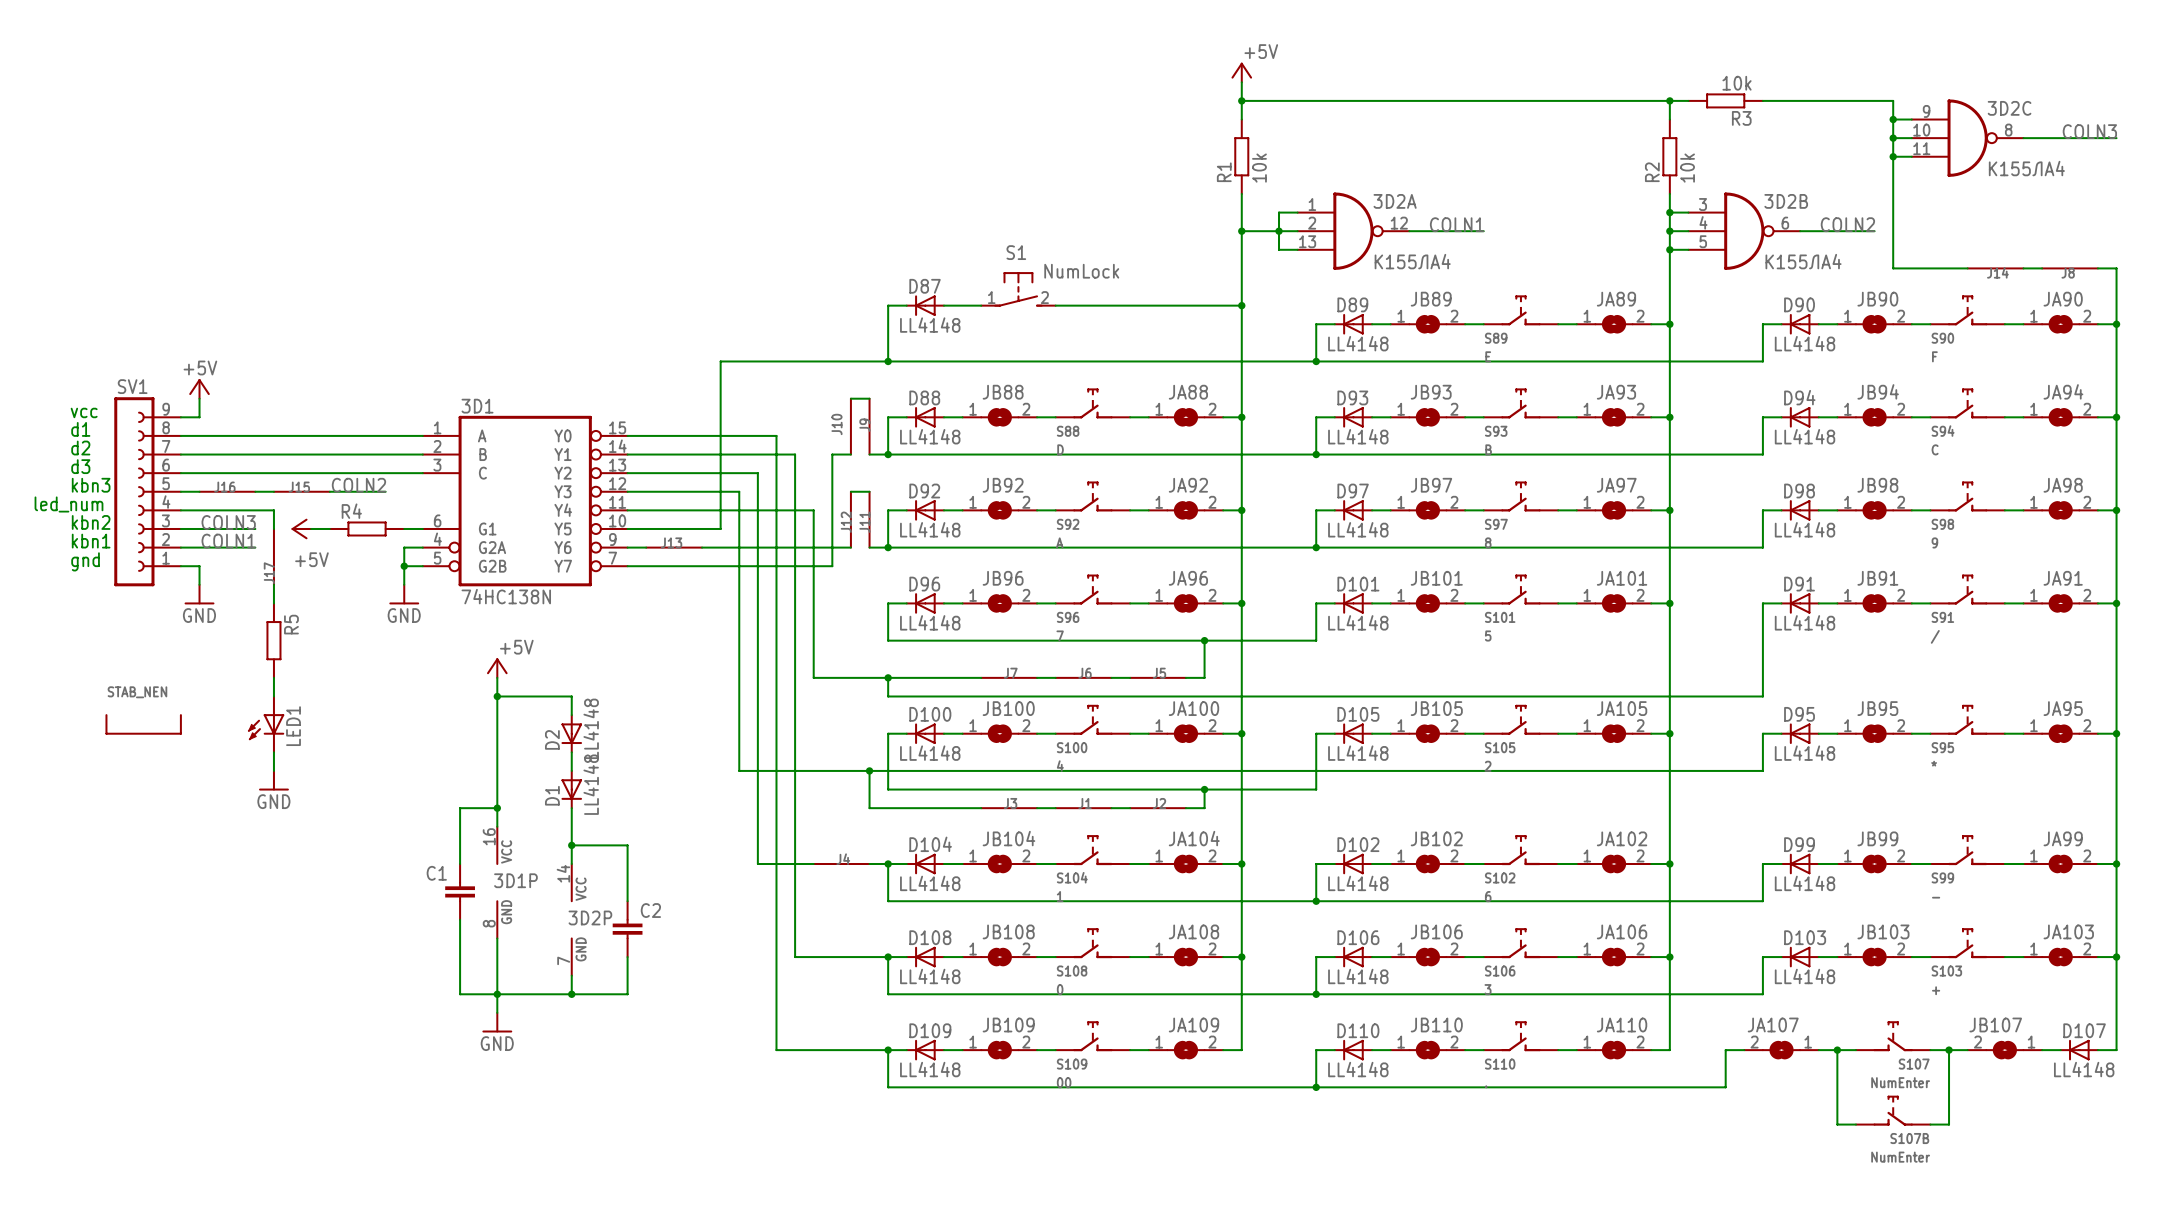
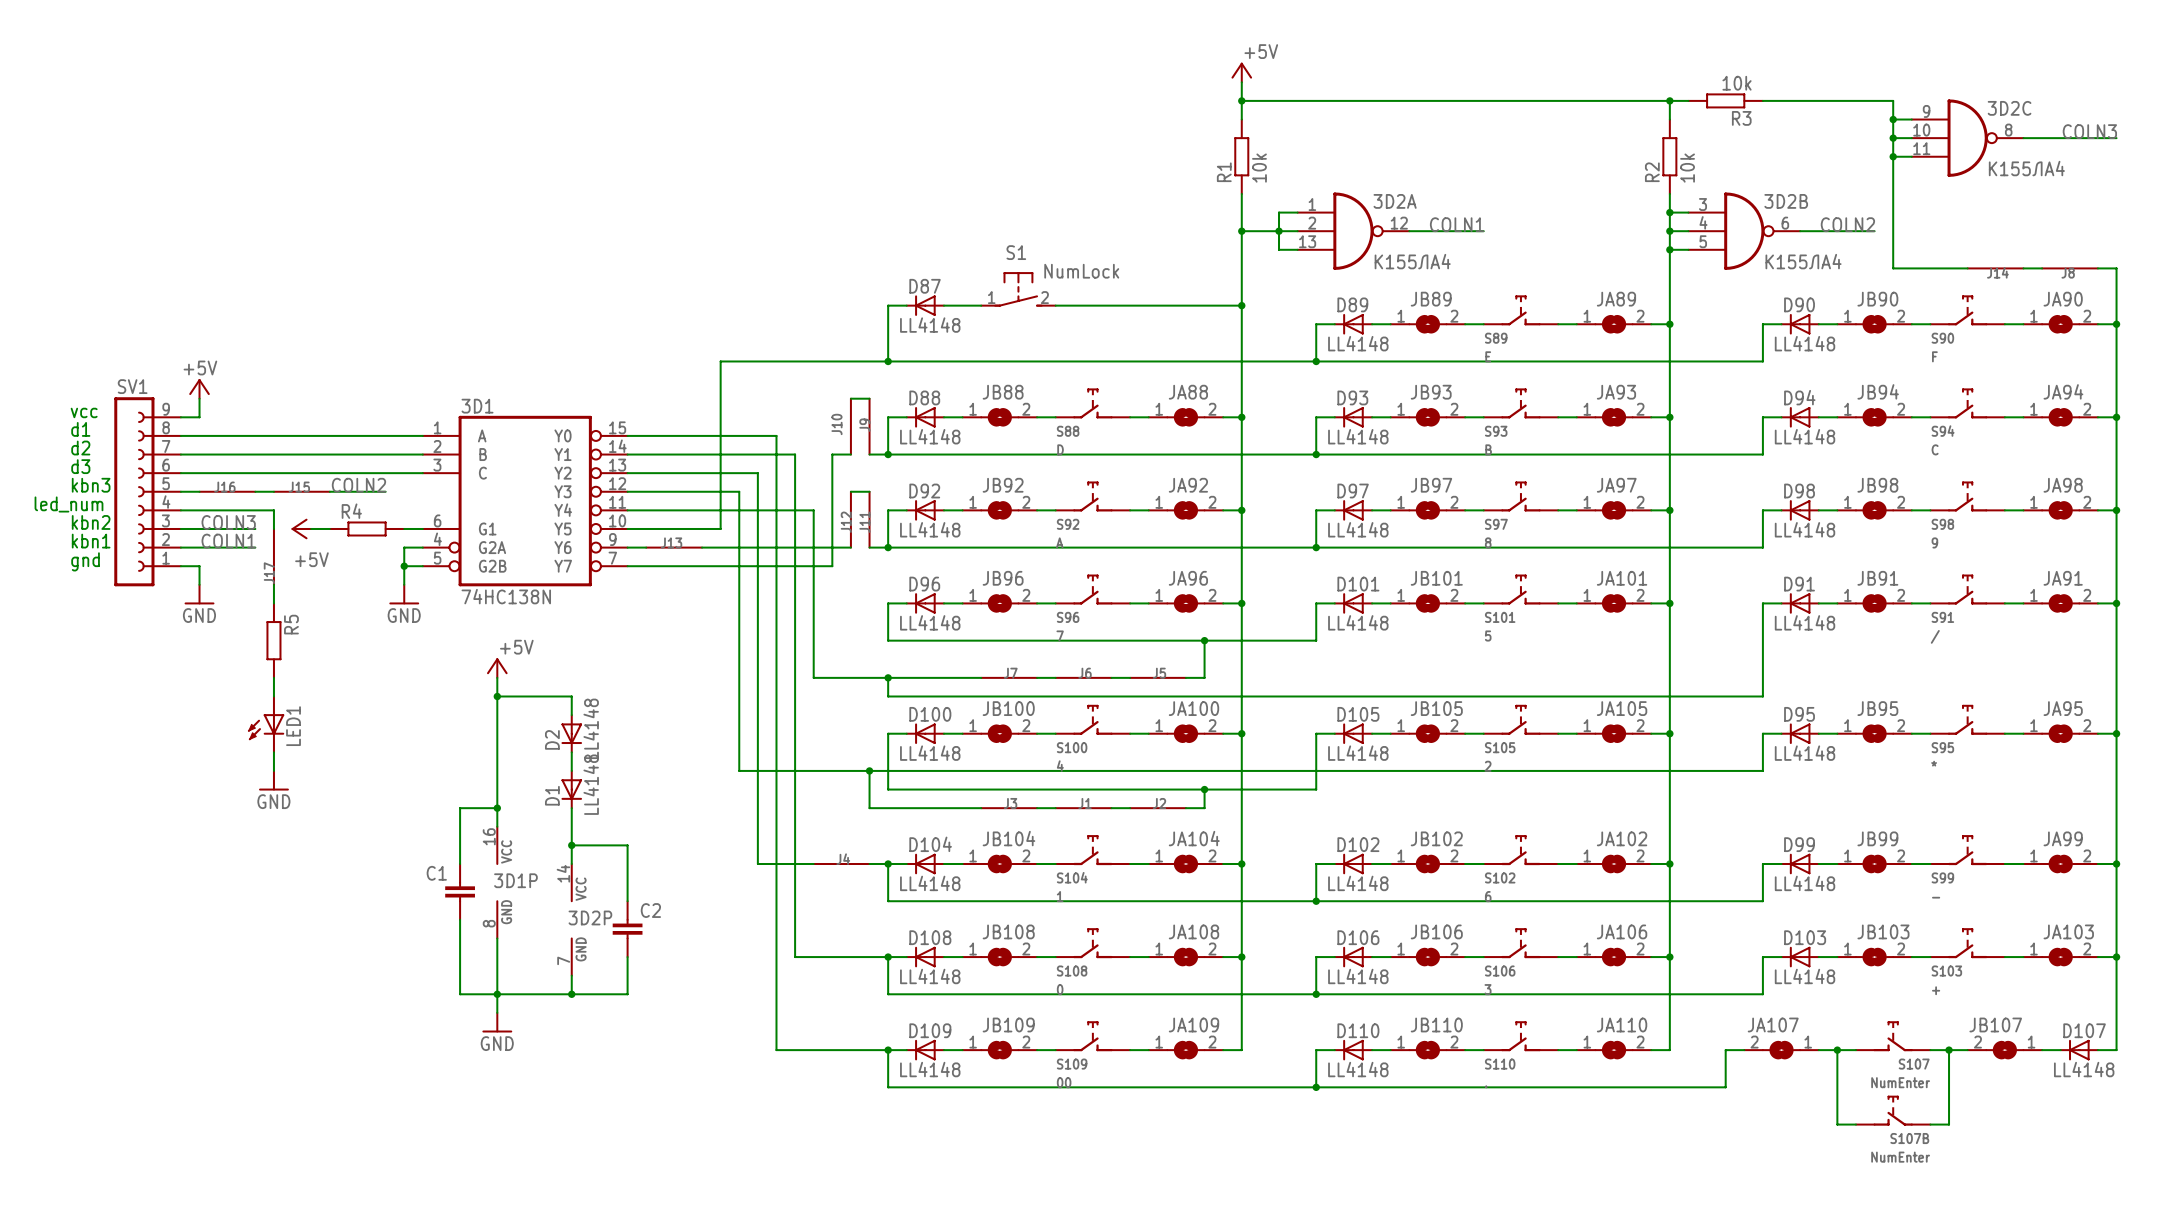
STAB_NEN: (143, 724) -> none

